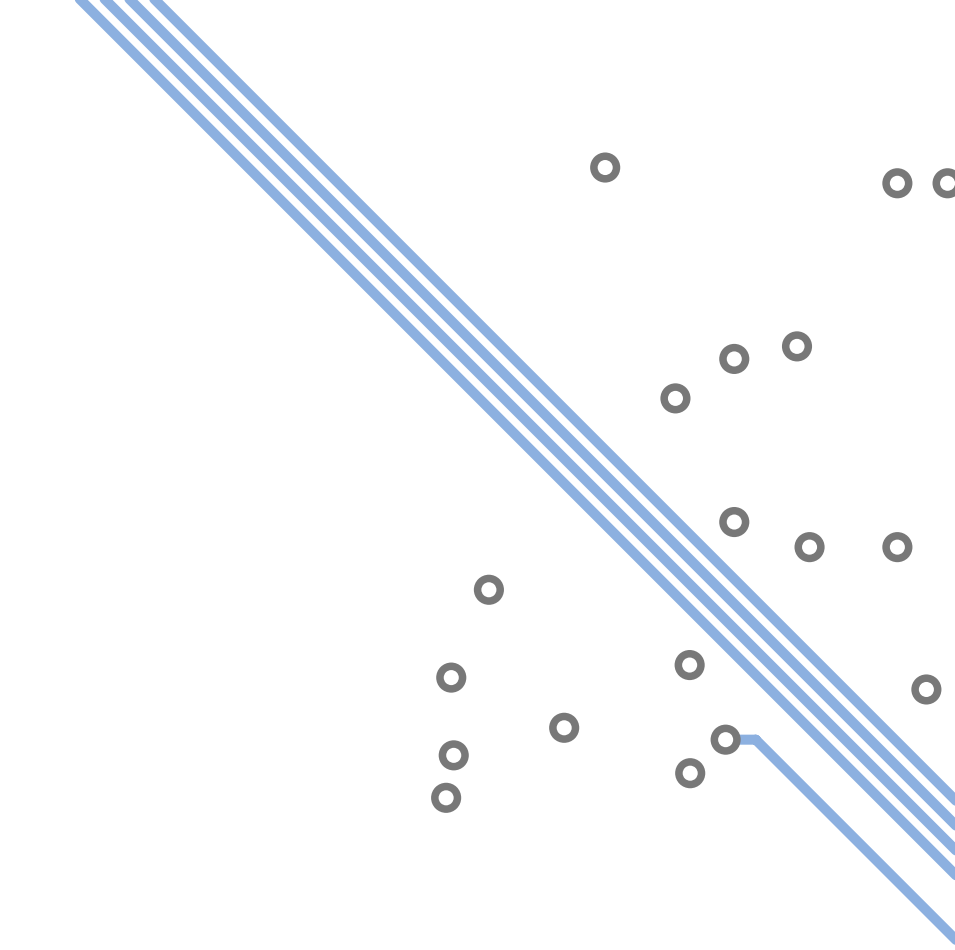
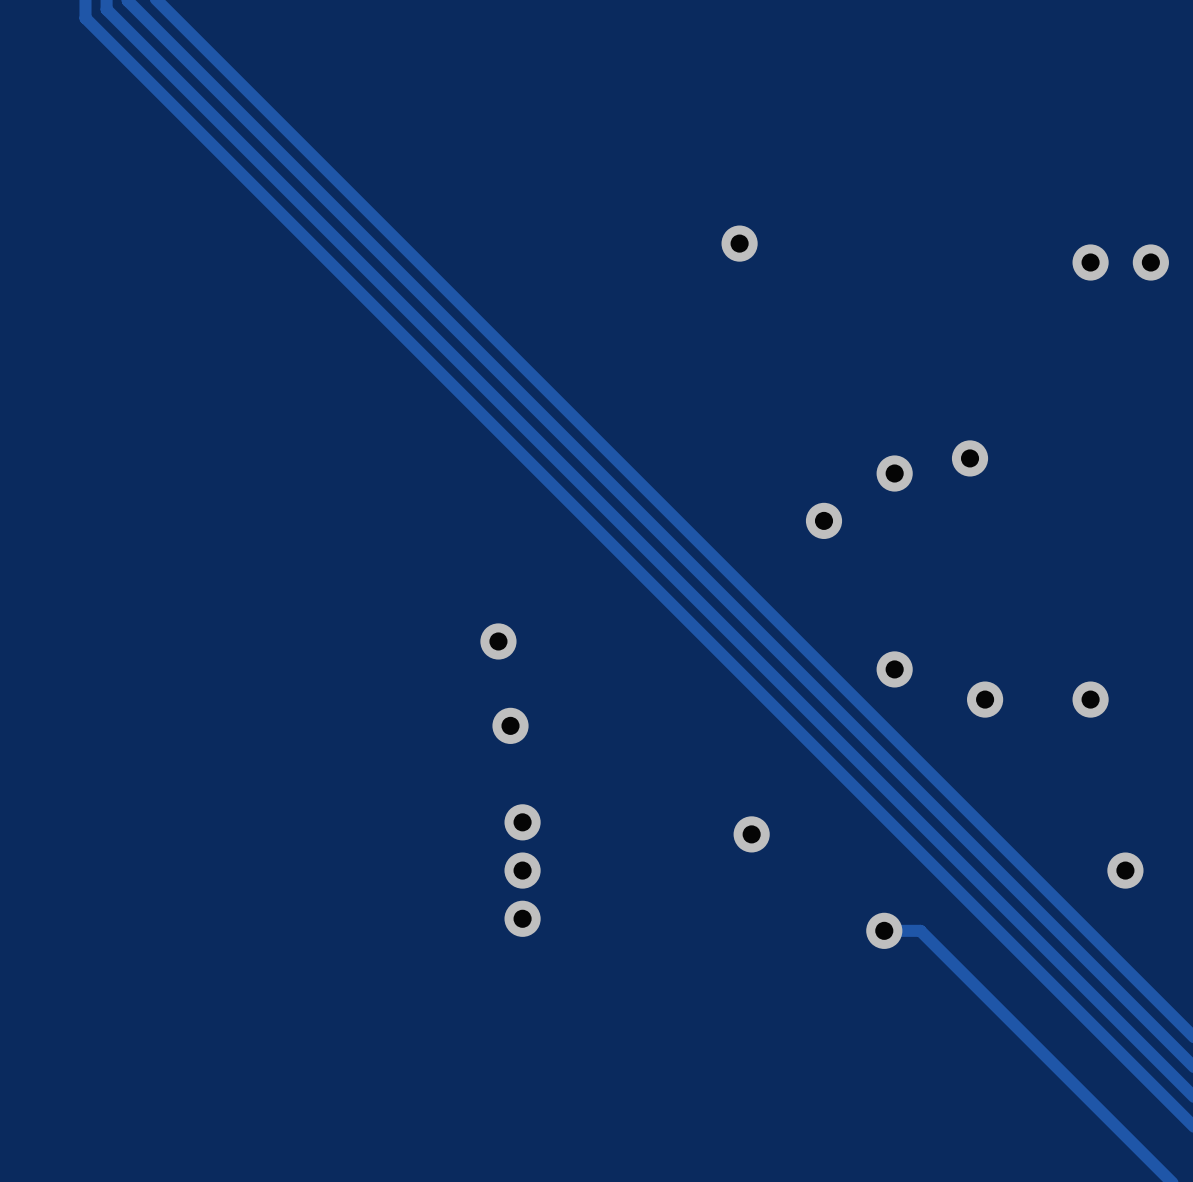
via: none -> (498, 641)
via: none -> (510, 725)
via: (488, 589) -> none
via: none -> (522, 822)
via: none -> (751, 834)
via: (689, 665) -> none
via: (451, 677) -> none
via: none -> (522, 870)
via: (564, 727) -> none
via position: (453, 755) -> (522, 918)
via: (690, 773) -> none
via: (446, 797) -> none

